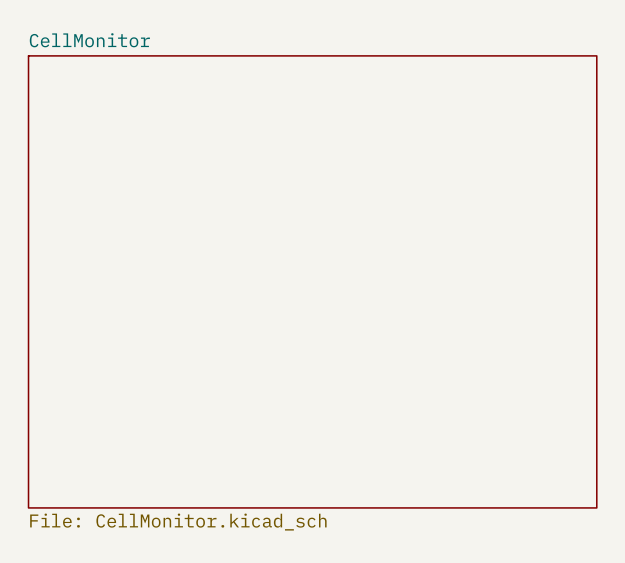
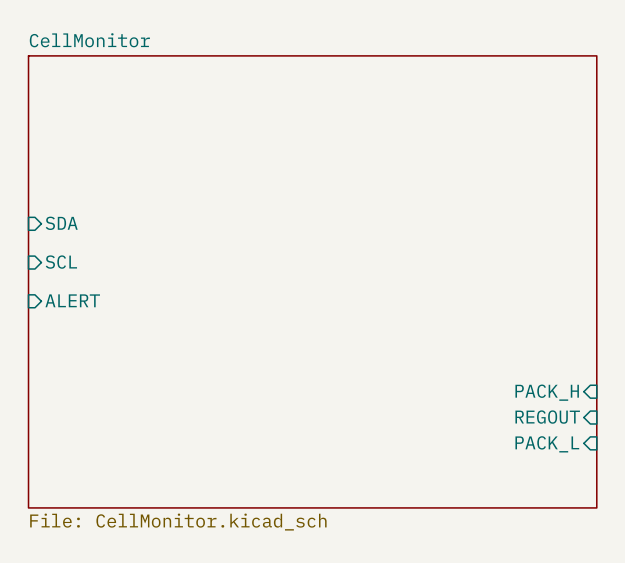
sheet pin: none -> SDA (61, 223)
sheet pin: none -> SCL (61, 262)
sheet pin: none -> ALERT (72, 300)
sheet pin: none -> PACK_H (547, 392)
sheet pin: none -> REGOUT (547, 417)
sheet pin: none -> PACK_L (547, 444)

